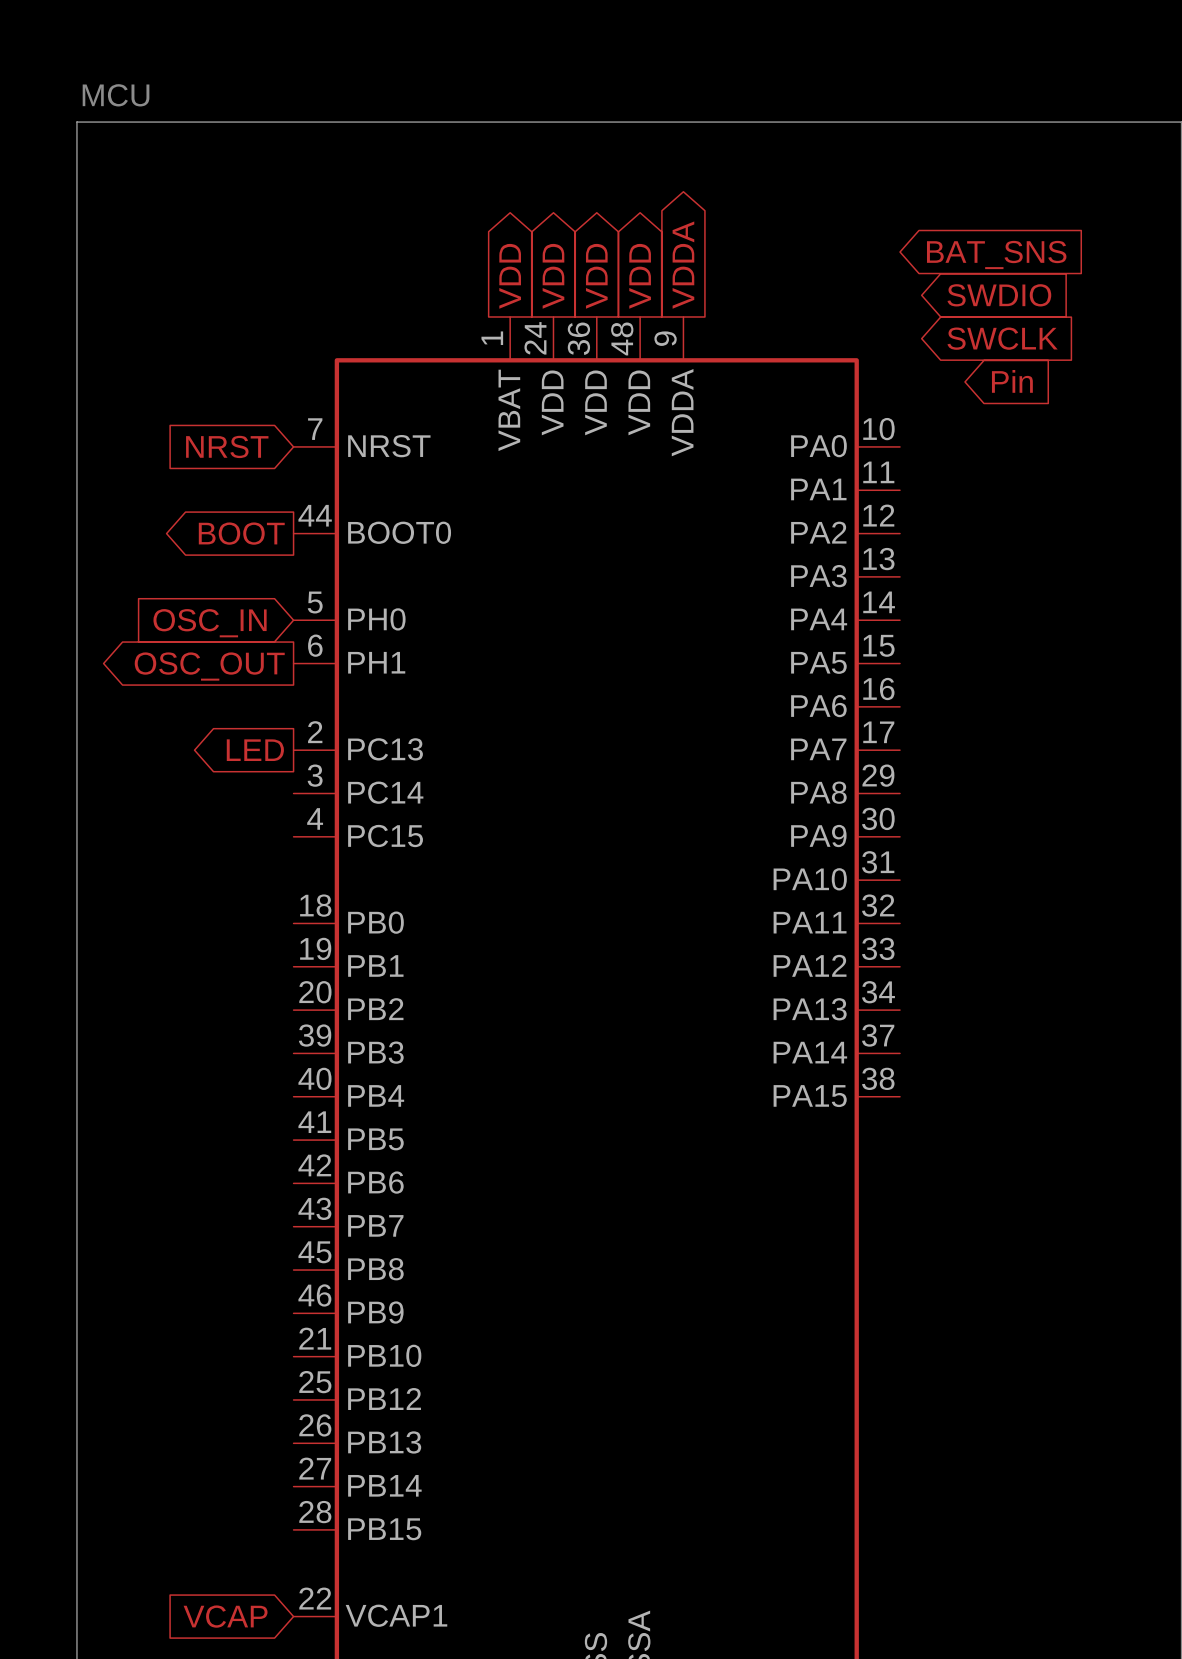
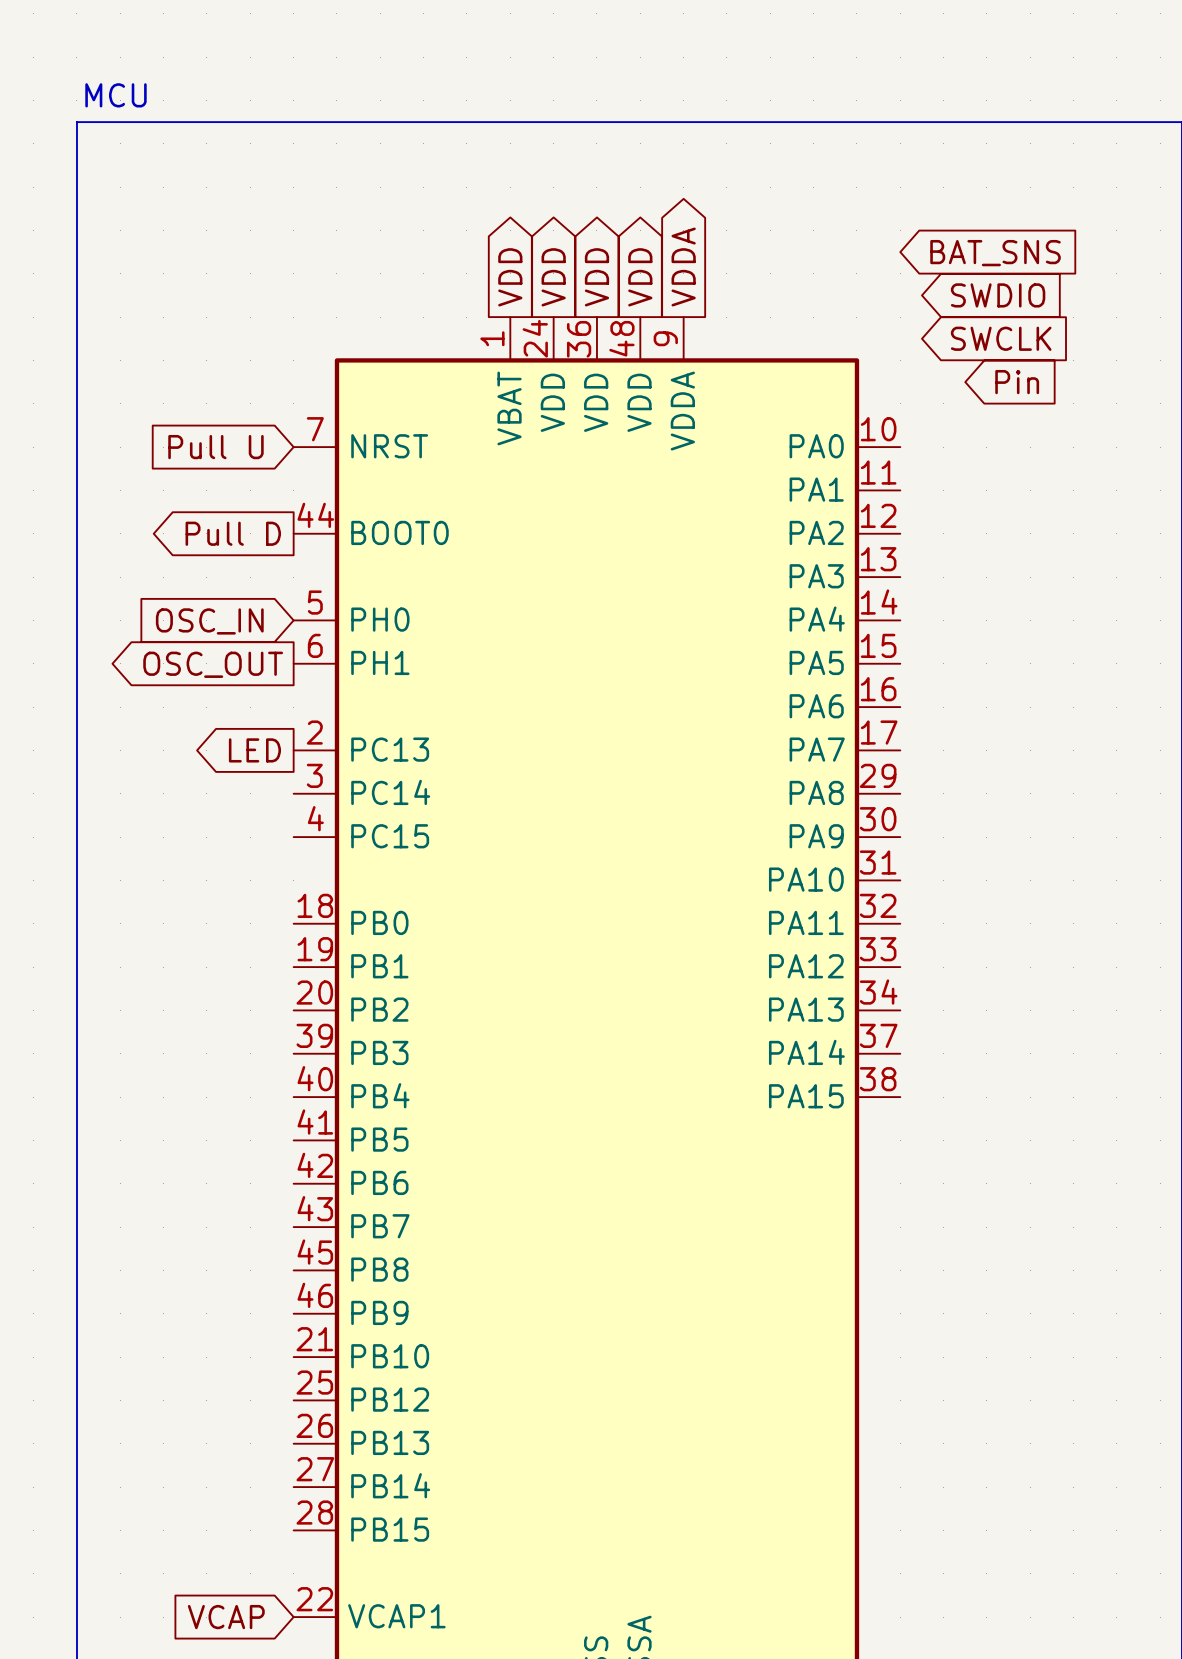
global label: NRST (227, 446) -> Pull U (215, 447)
global label: BOOT (241, 533) -> Pull D (233, 533)

